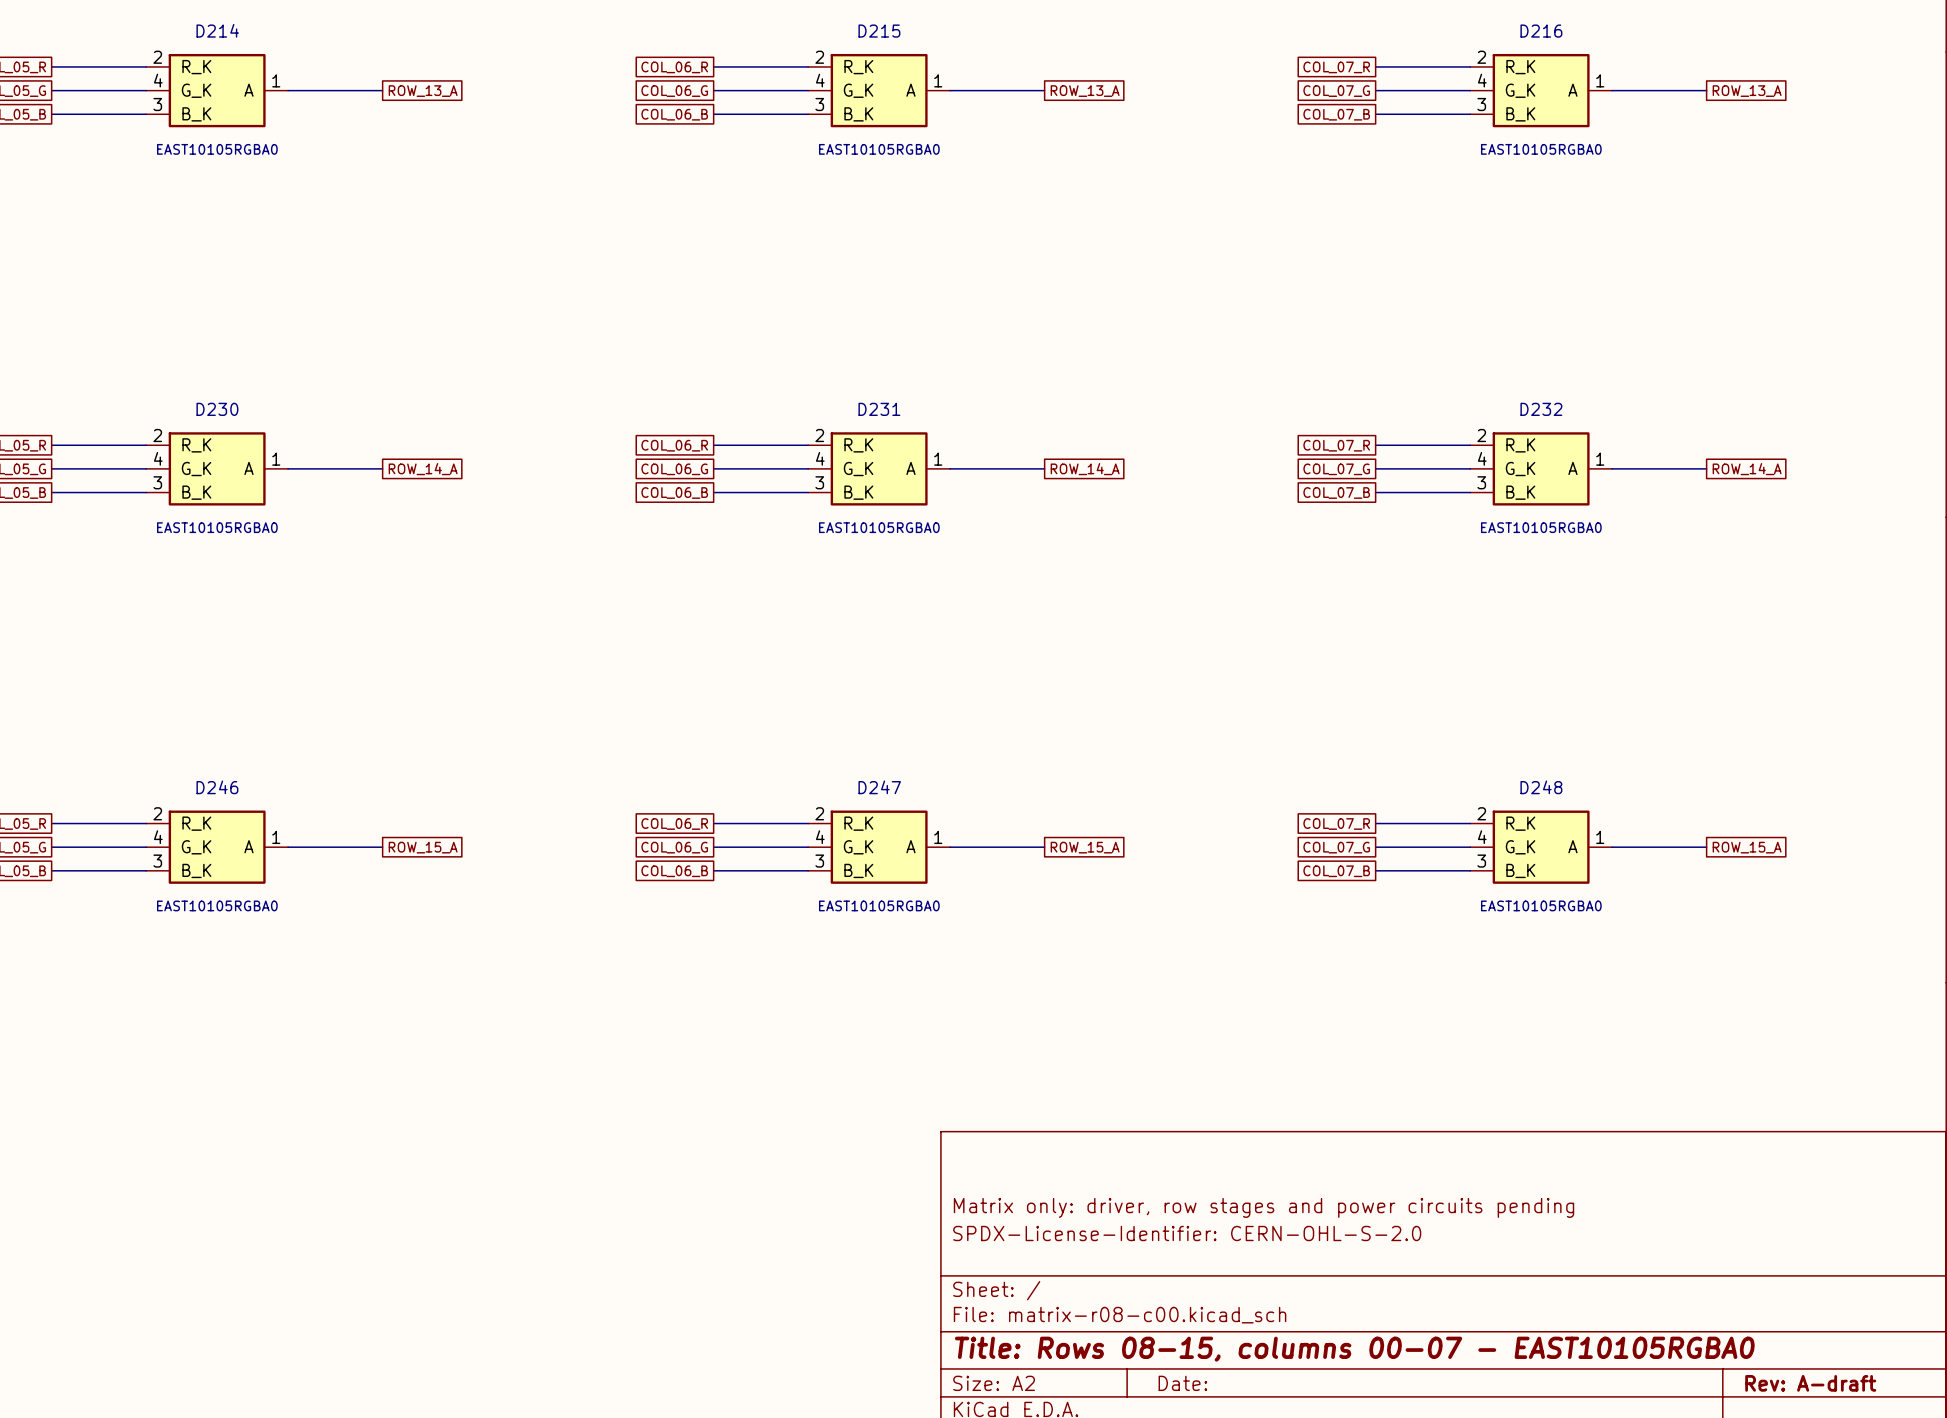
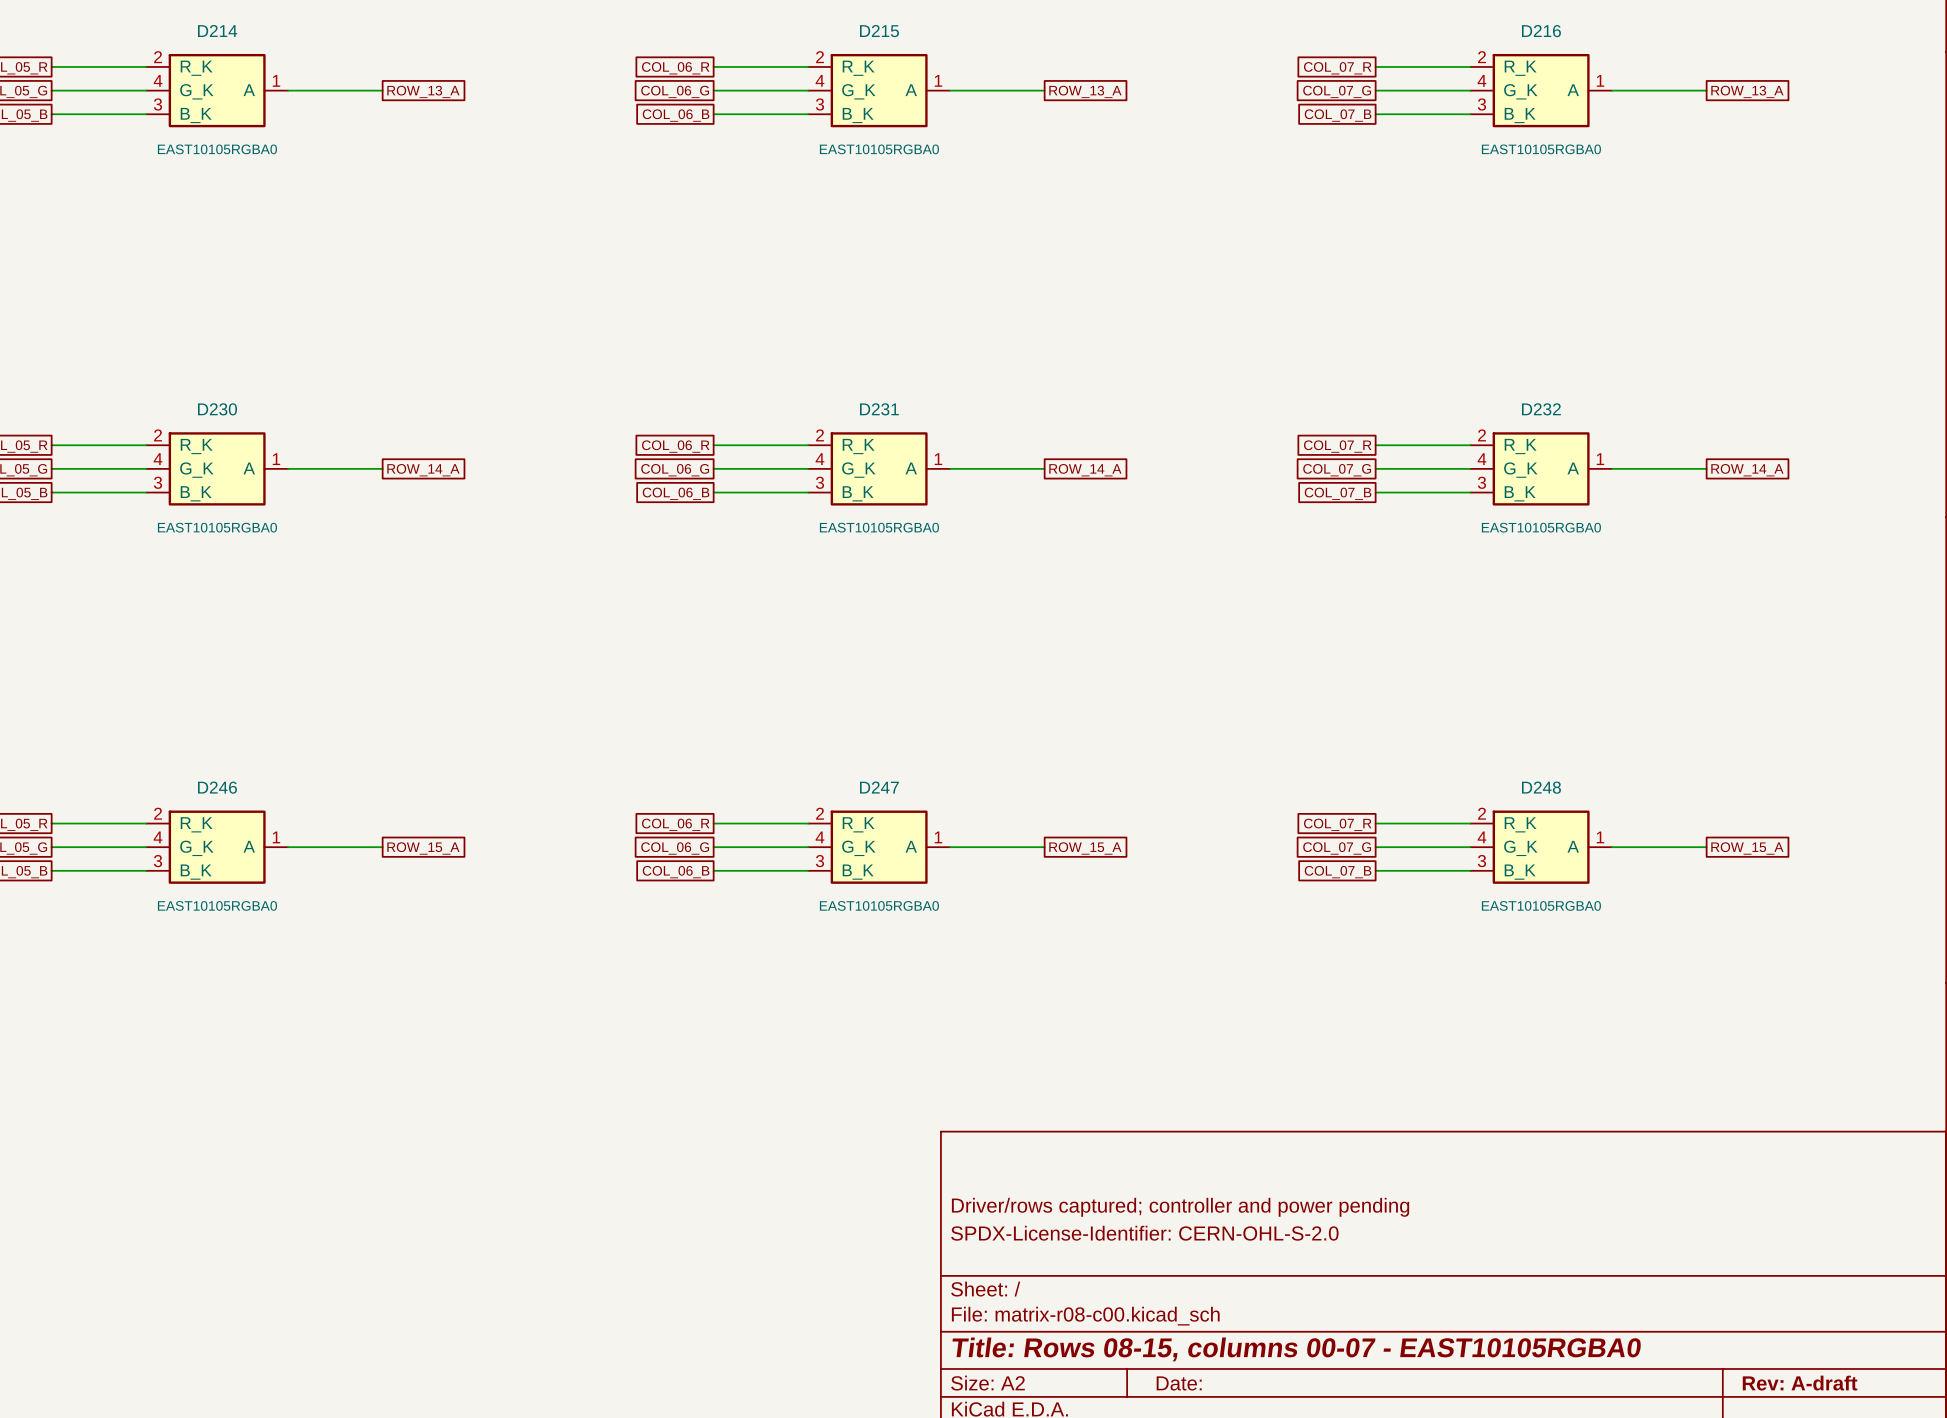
title block: Matrix only: driver, row stages and power circuits pending (1264, 1207) -> Driver/rows captured; controller and power pending (1180, 1207)

